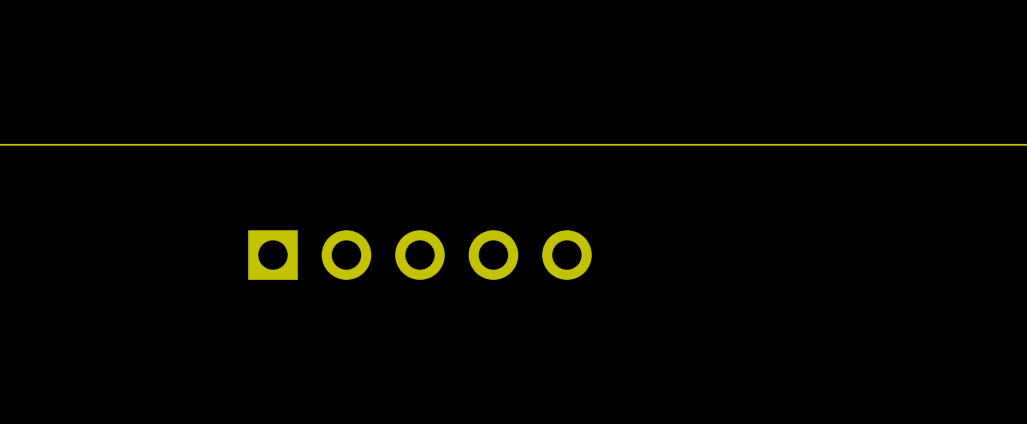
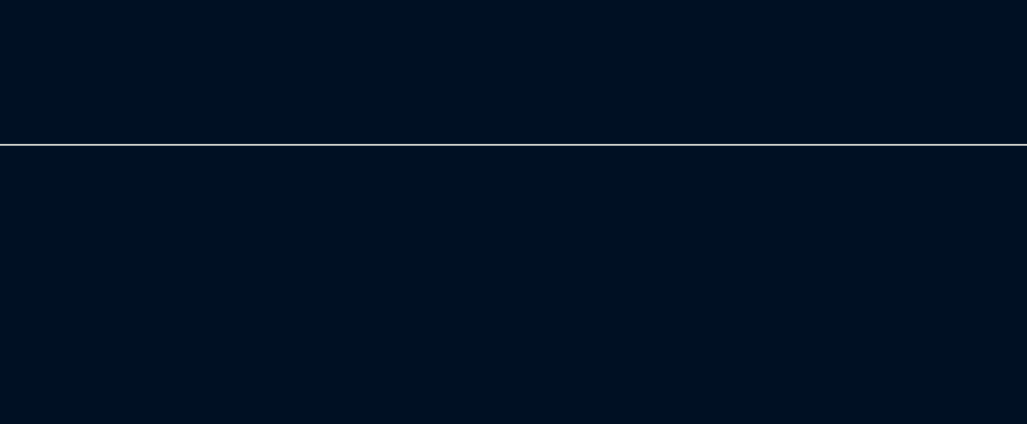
part: (419, 255) -> none

